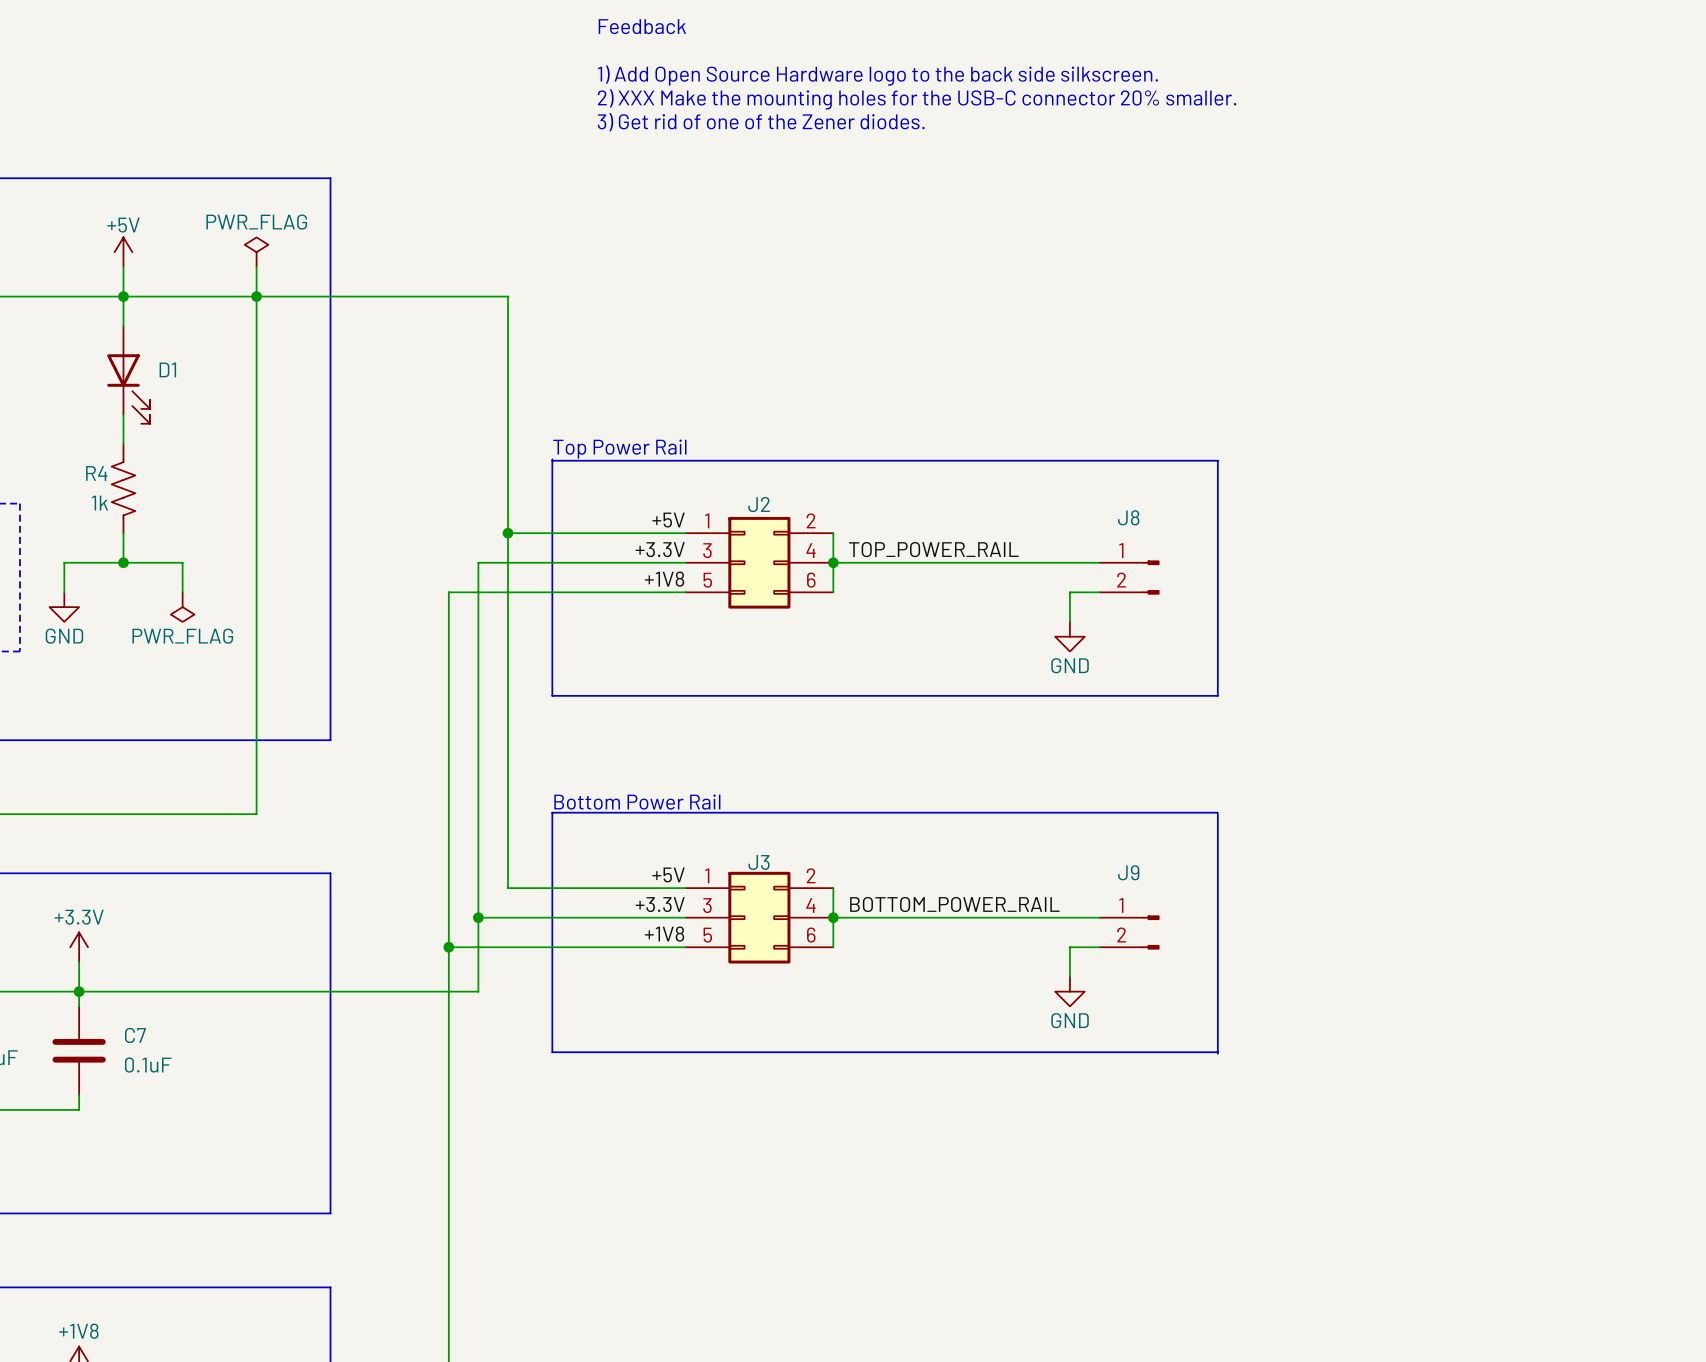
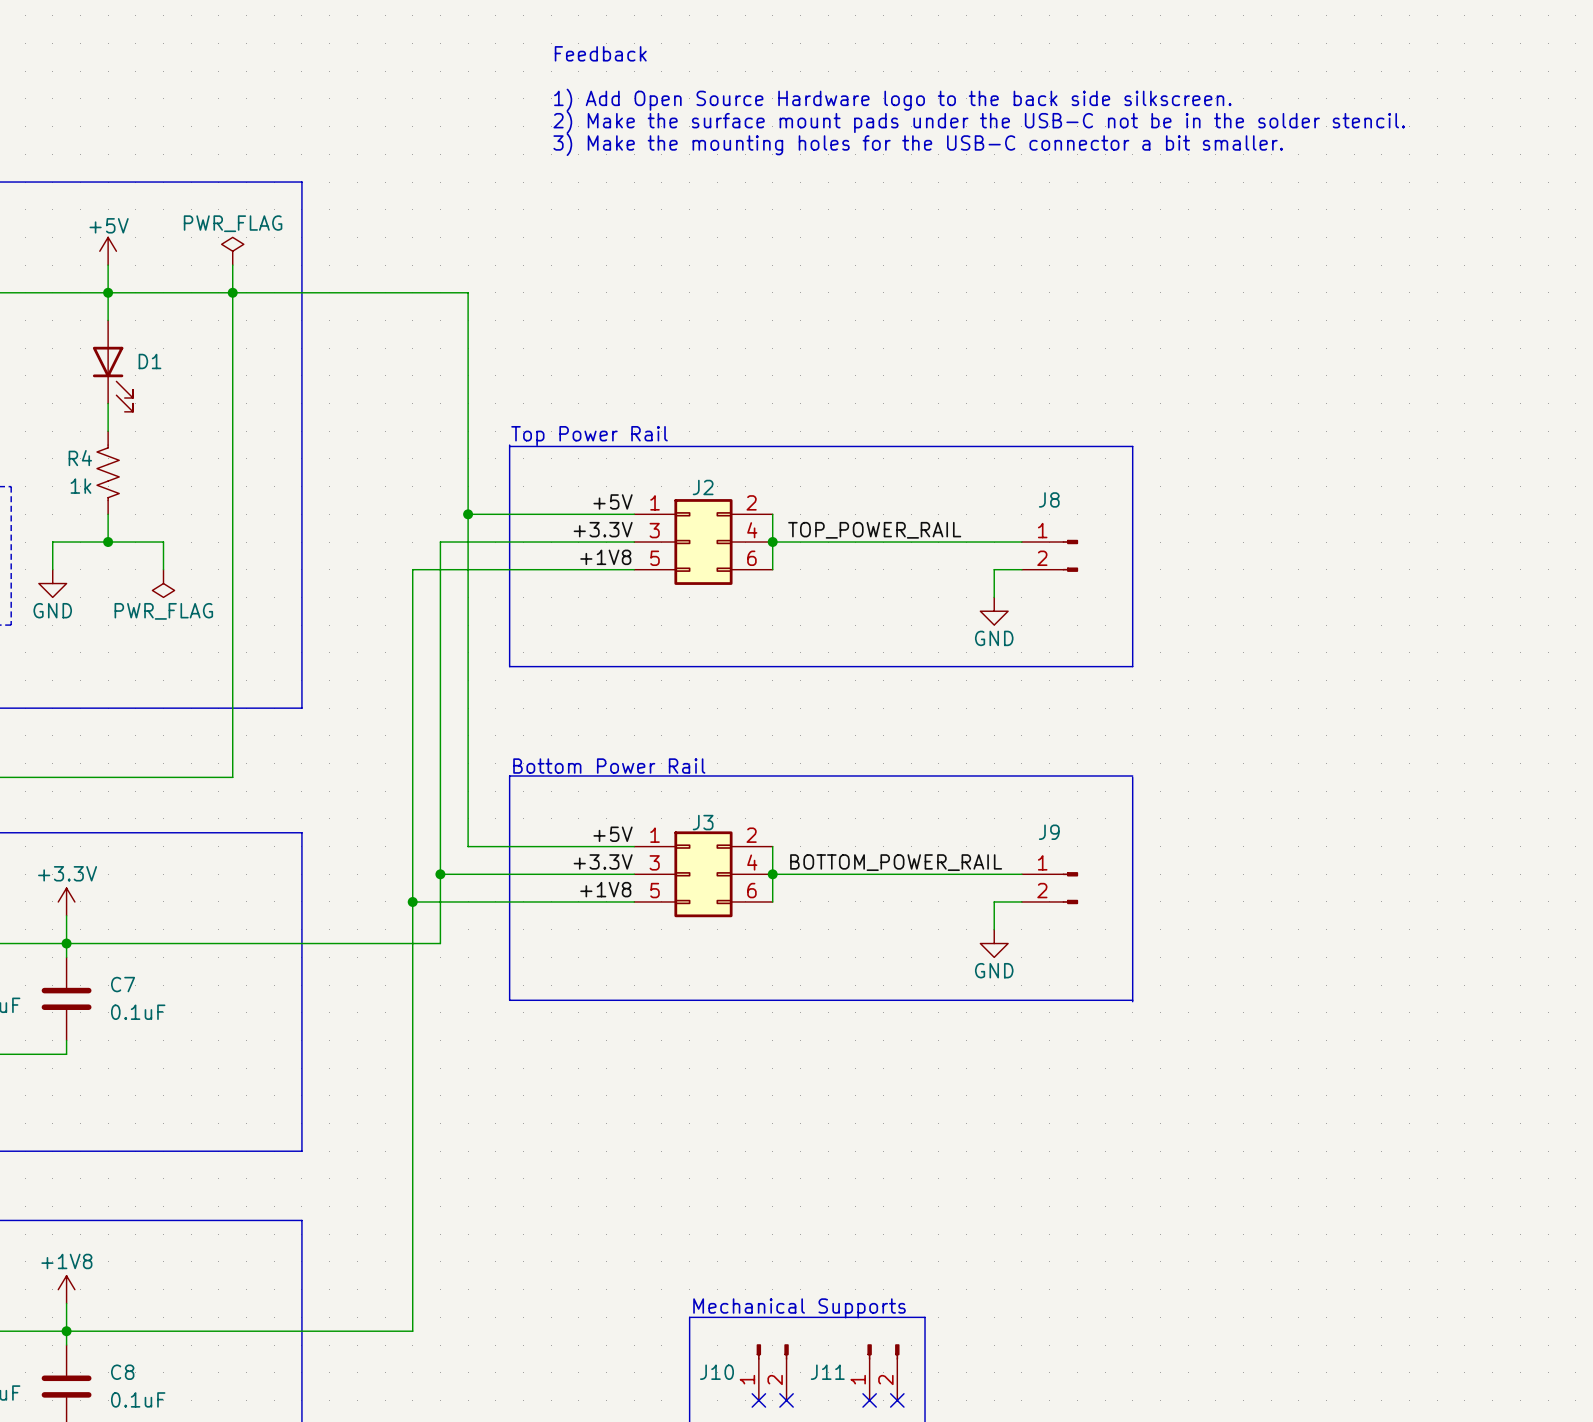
text position: Feedback (642, 26) -> Feedback (600, 53)
text position: 1) Add Open Source Hardware logo to the back side silkscreen. (877, 75) -> 1) Add Open Source Hardware logo to the back side silkscreen. (892, 100)
text: 2) XXX Make the mounting holes for the USB-C connector 20% smaller. (917, 99) -> none
text: none -> 2) Make the surface mount pads under the USB-C not be in the solder stencil. (979, 122)
text: 3) Get rid of one of the Zener diodes. (761, 122) -> none
text: none -> 3) Make the mounting holes for the USB-C connector a bit smaller. (918, 144)

